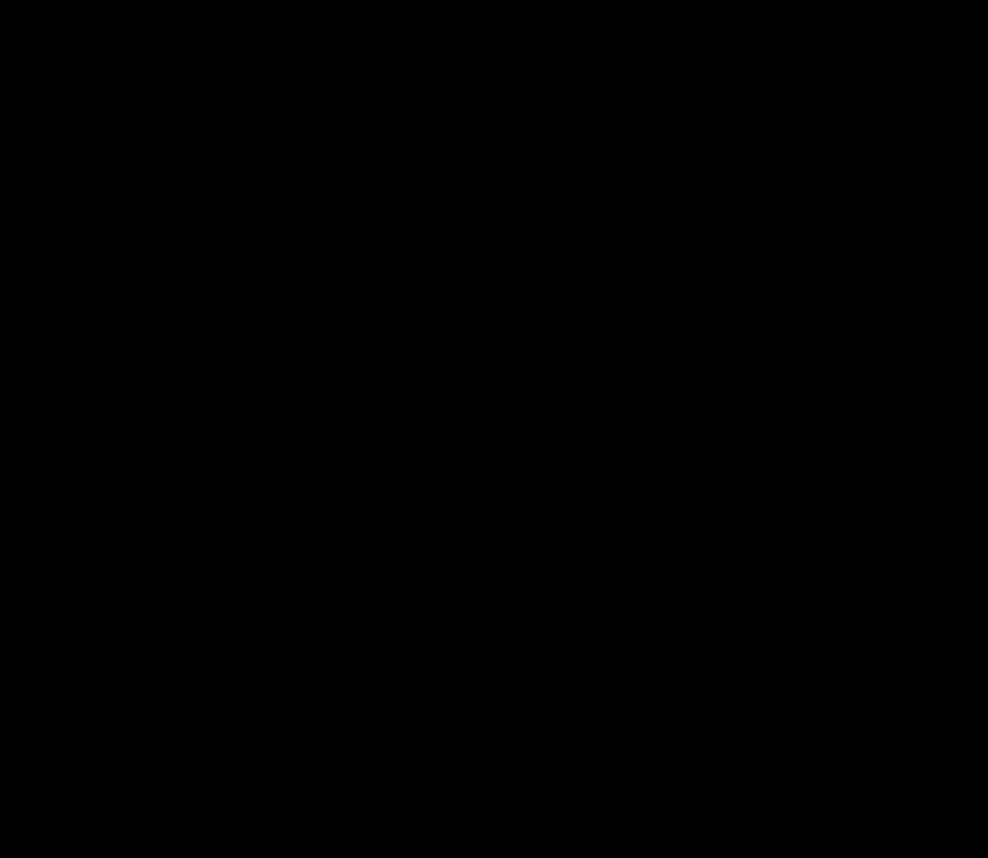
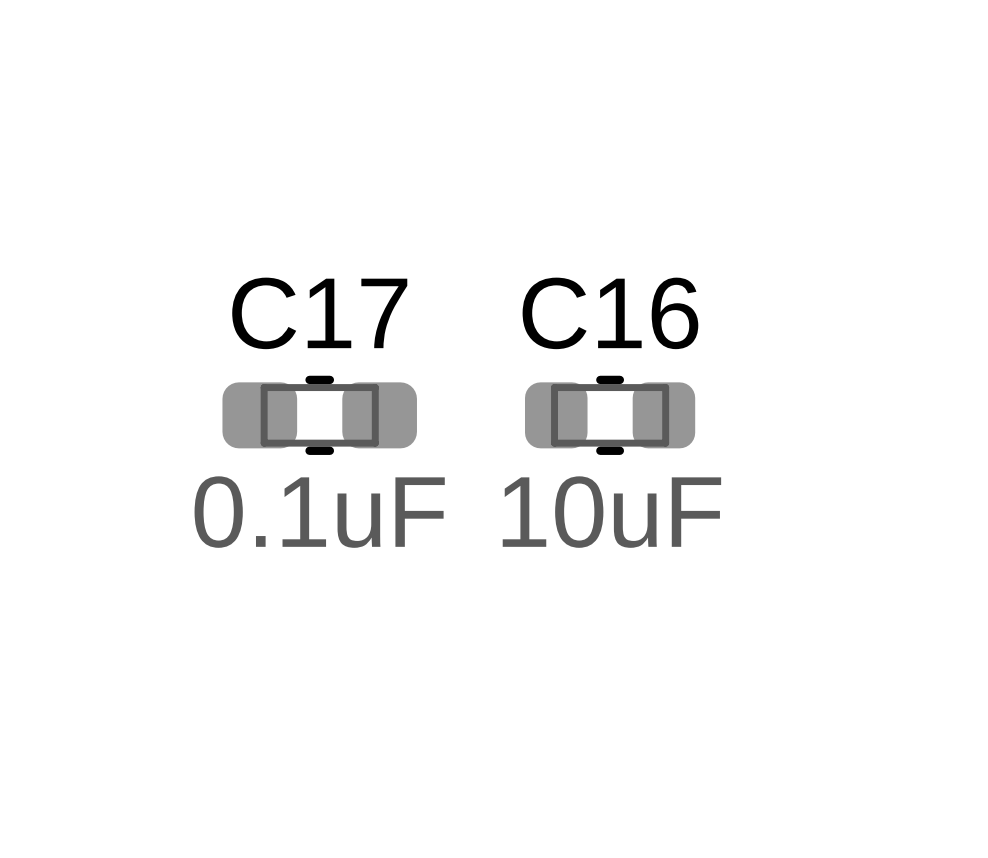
C17: none -> 0.1uF (319, 415)
C16: none -> 10uF (610, 415)

